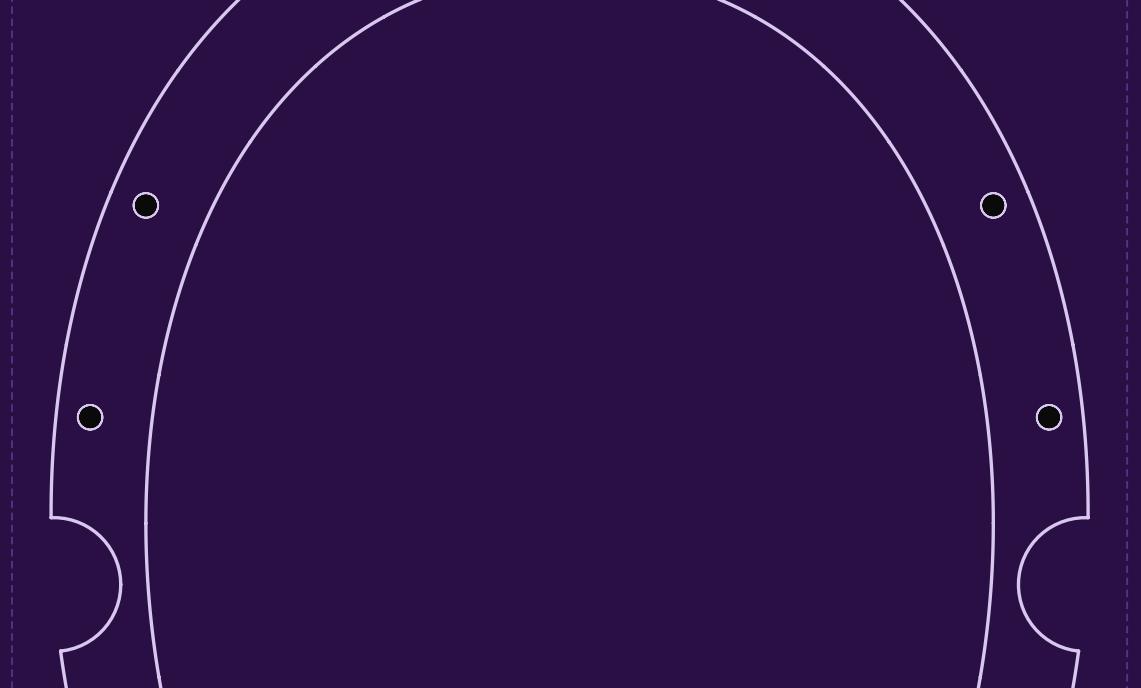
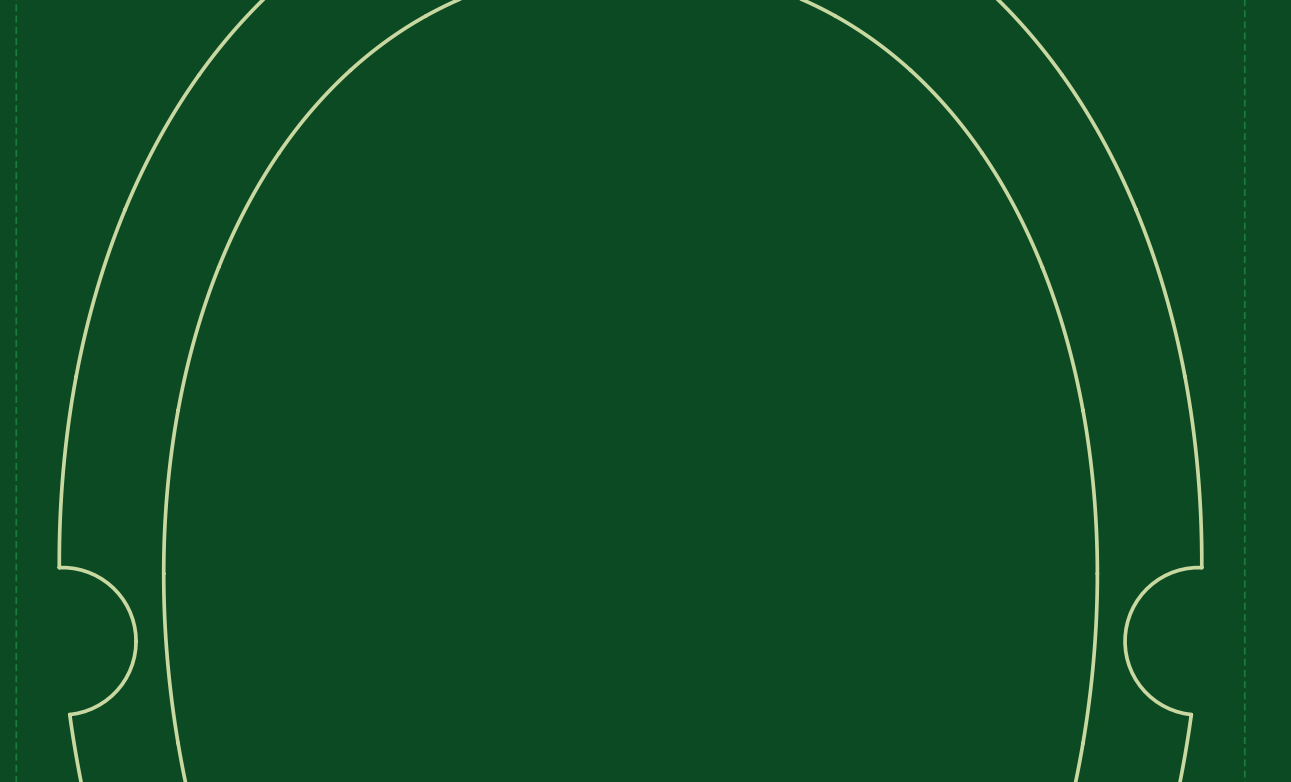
part: (145, 205) -> none
part: (993, 205) -> none
part: (90, 417) -> none
part: (1049, 417) -> none

